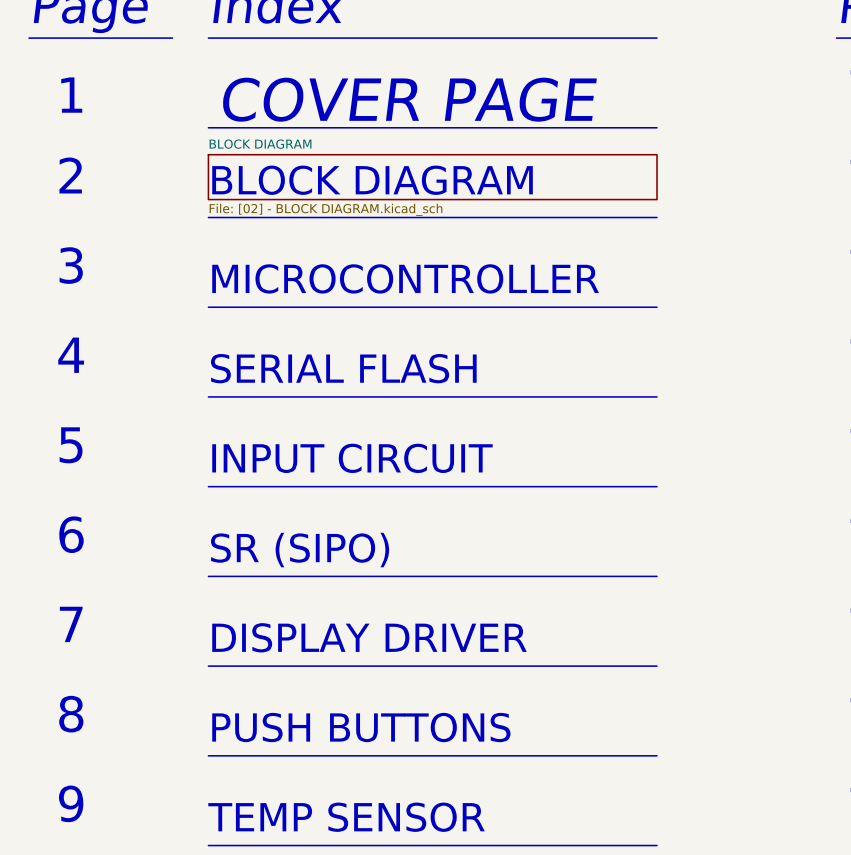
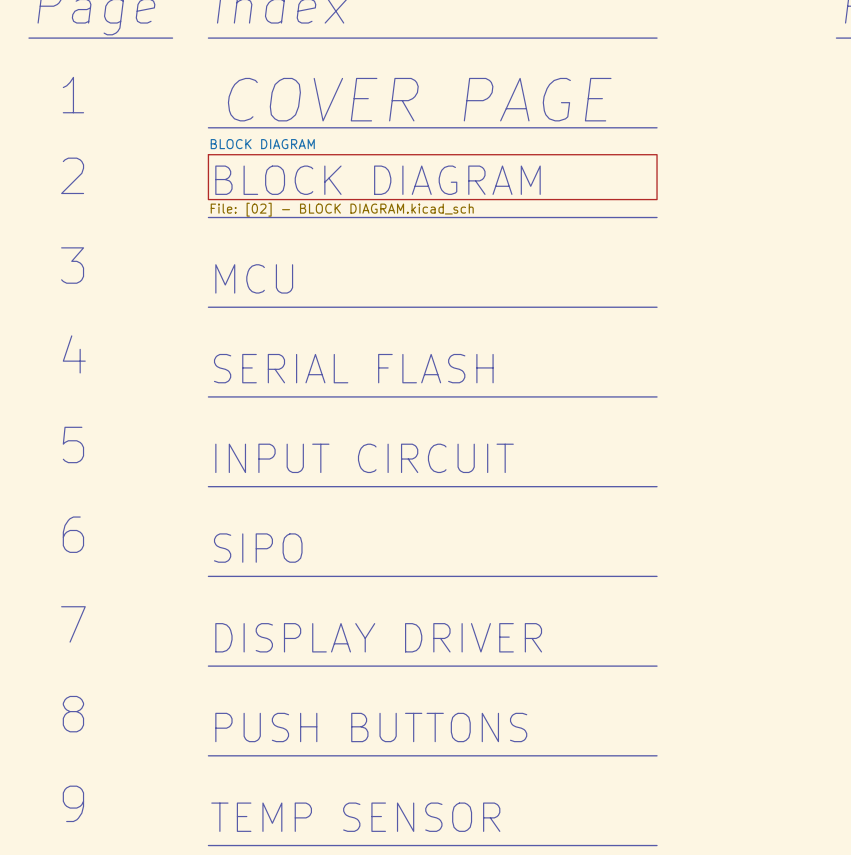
text: MICROCONTROLLER (405, 278) -> MCU (254, 278)
text: SR (SIPO) (300, 550) -> SIPO (258, 548)

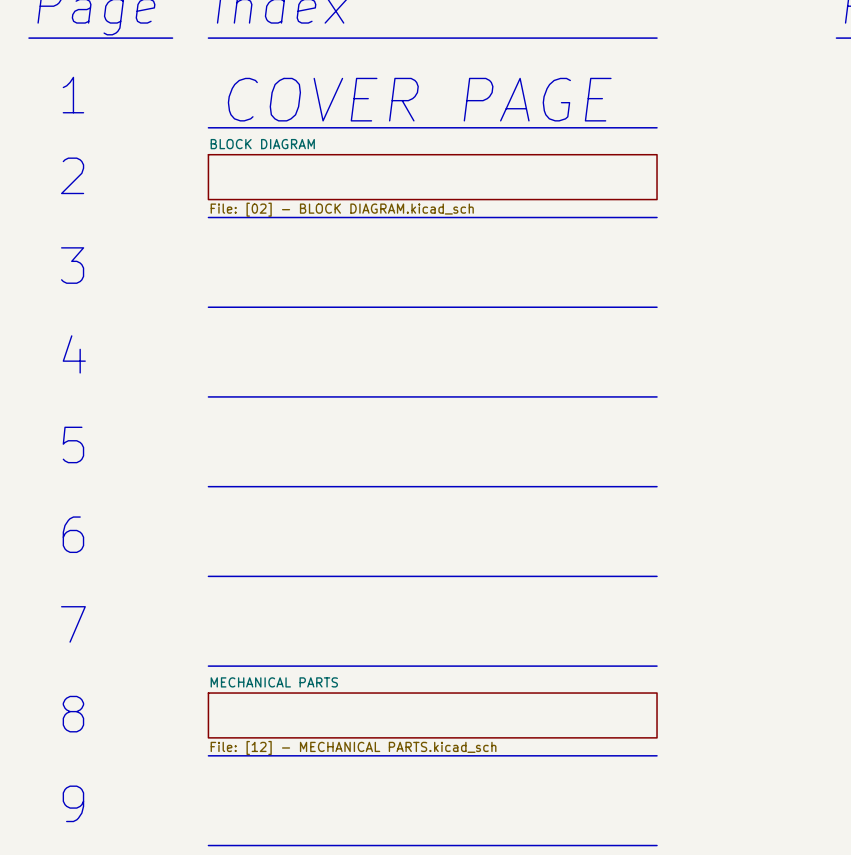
text: BLOCK DIAGRAM (378, 180) -> none
text: MCU (254, 278) -> none
text: SERIAL FLASH (353, 368) -> none
text: INPUT CIRCUIT (364, 458) -> none
text: SIPO (258, 548) -> none
text: DISPLAY DRIVER (378, 637) -> none
sheet MECHANICAL PARTS: none -> File: [12] - MECHANICAL PARTS.kicad_sch (432, 715)
text: PUSH BUTTONS (371, 727) -> none
text: TEMP SENSOR (355, 817) -> none

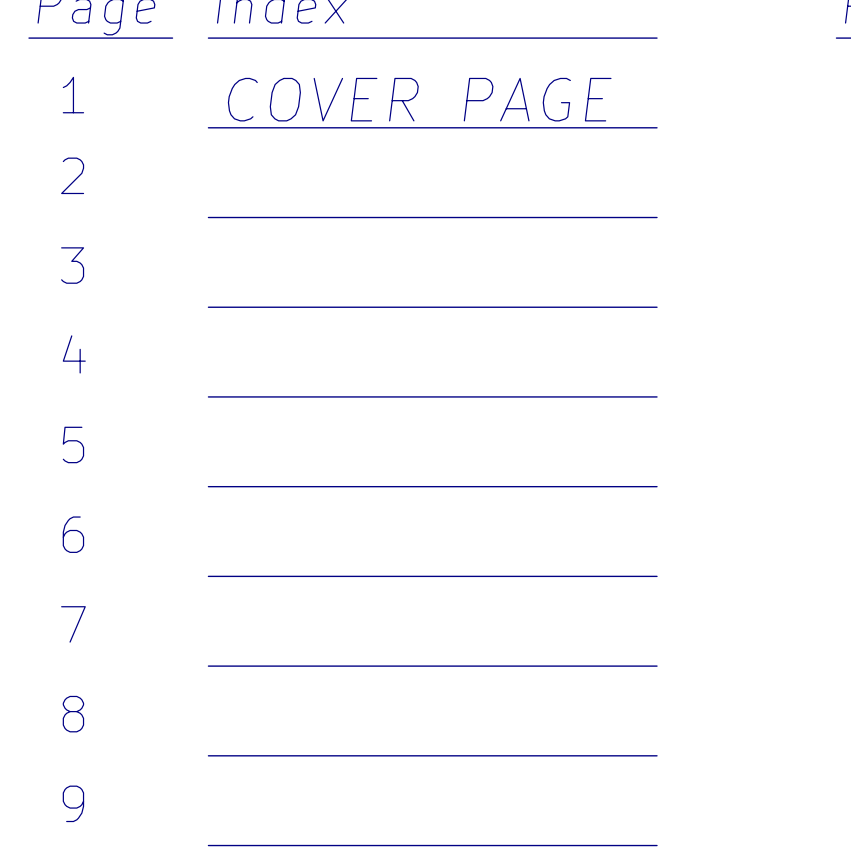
sheet BLOCK DIAGRAM: File: [02] - BLOCK DIAGRAM.kicad_sch (432, 177) -> none
sheet MECHANICAL PARTS: File: [12] - MECHANICAL PARTS.kicad_sch (432, 715) -> none

